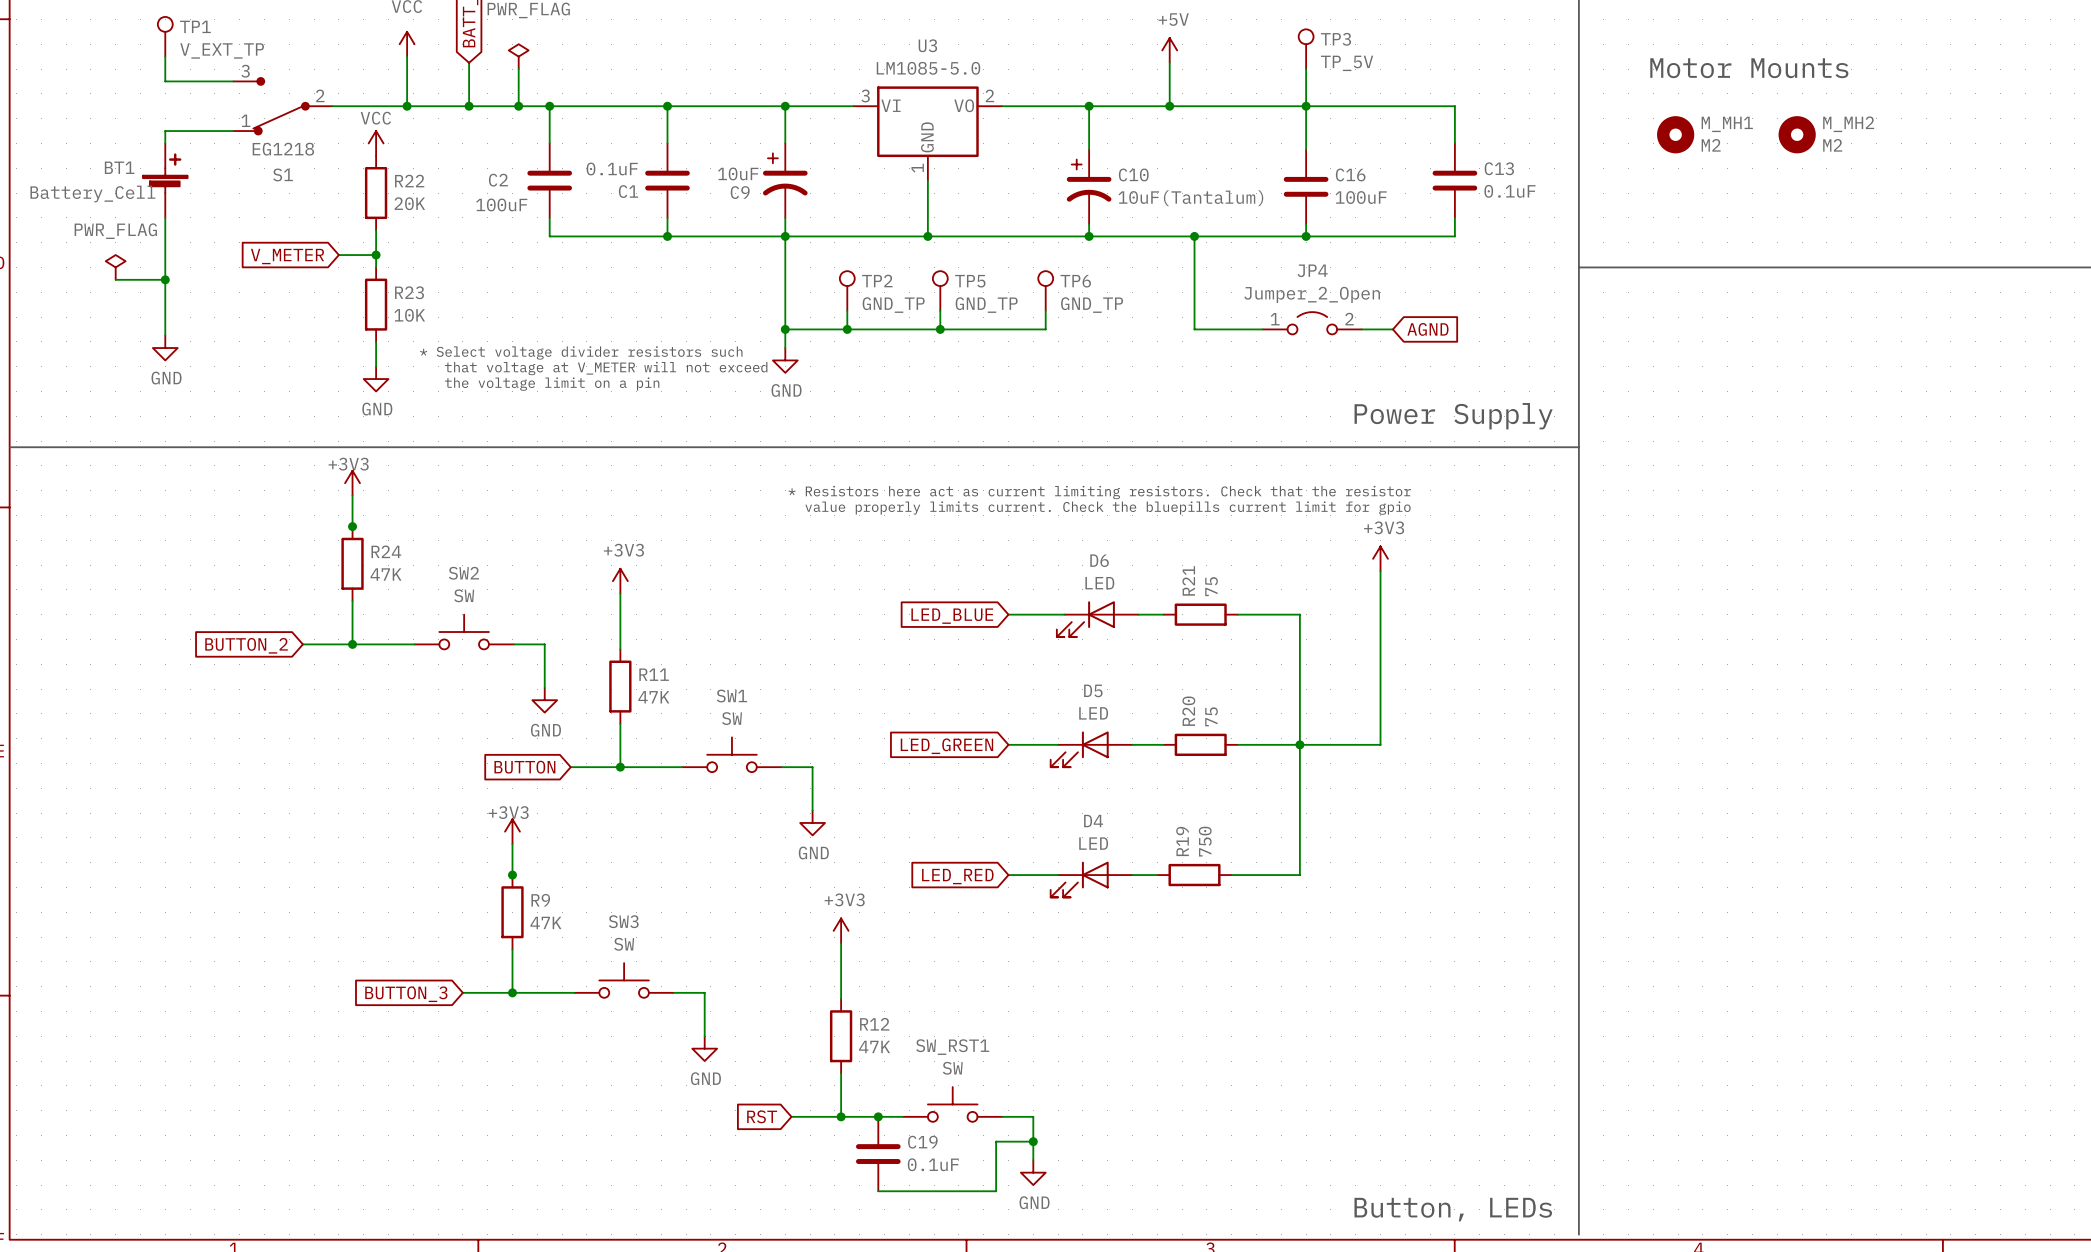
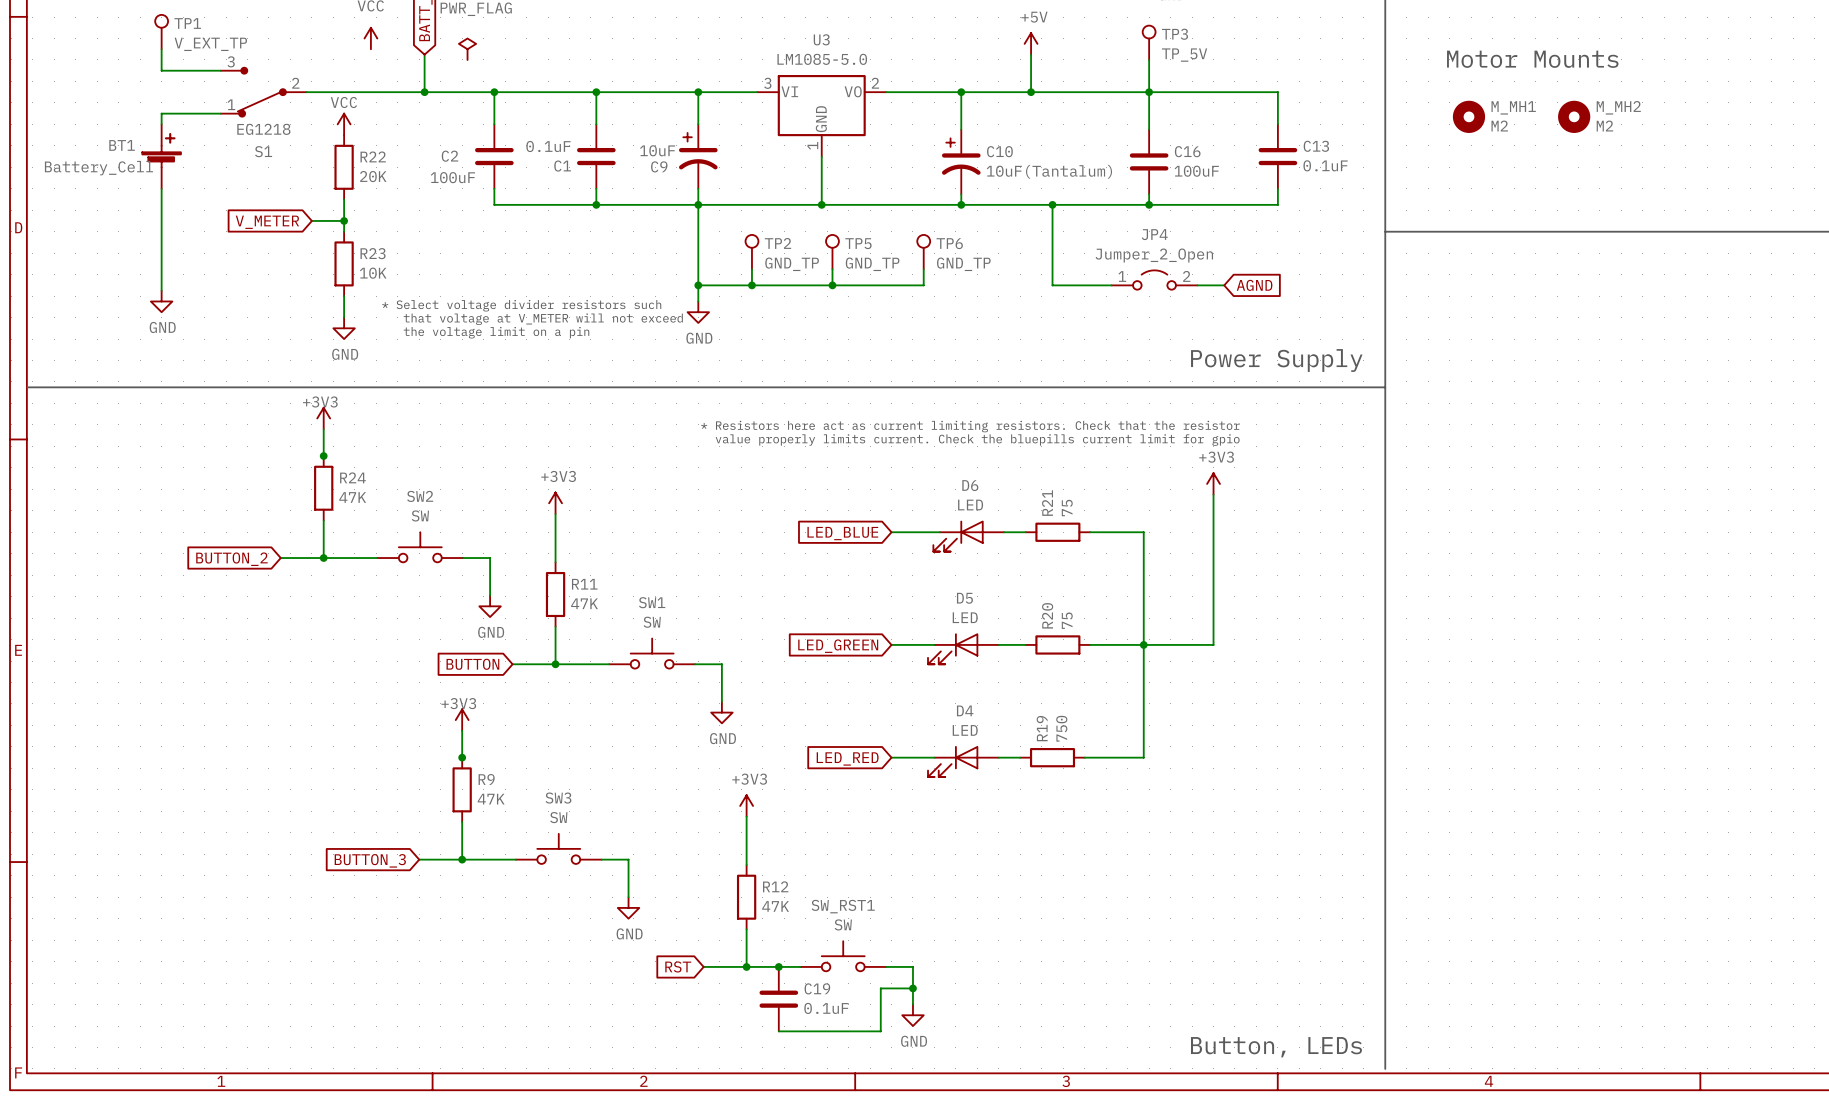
wire: (407, 56) (407, 106) -> none
wire: (518, 69) (518, 106) -> none
junction: (407, 106) -> none
junction: (518, 106) -> none
power symbol: PWR_FLAG (115, 267) -> none
wire: (115, 279) (165, 279) -> none
junction: (165, 279) -> none

